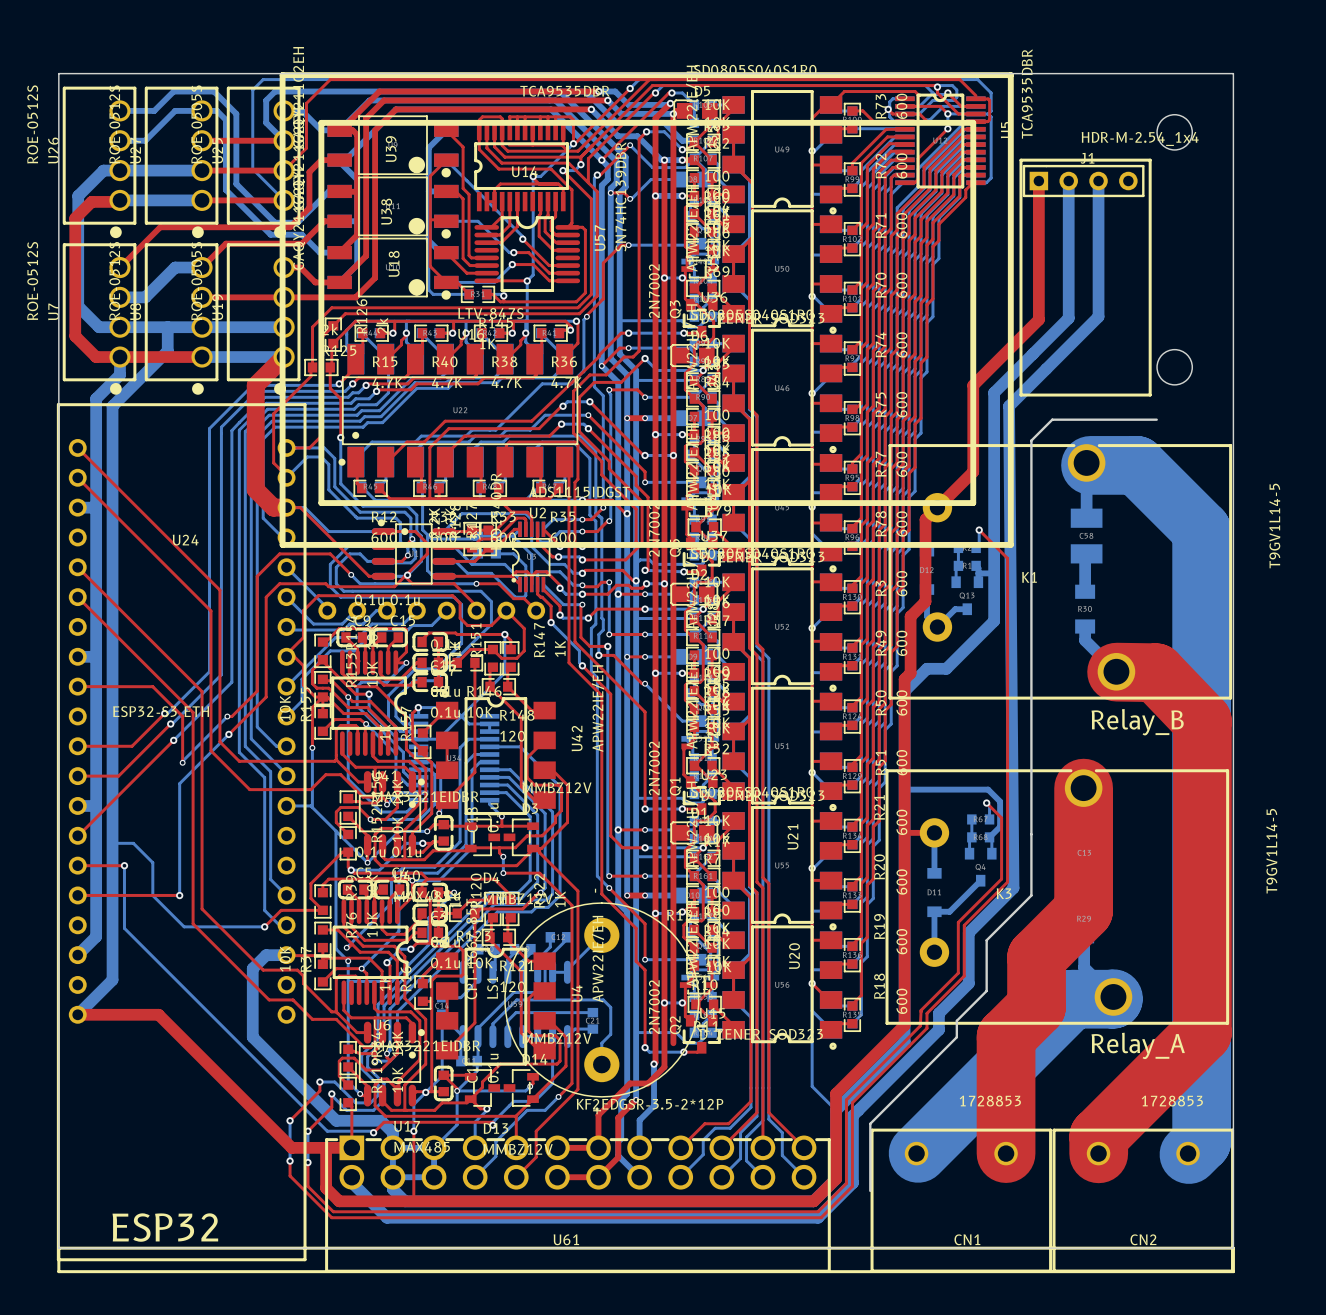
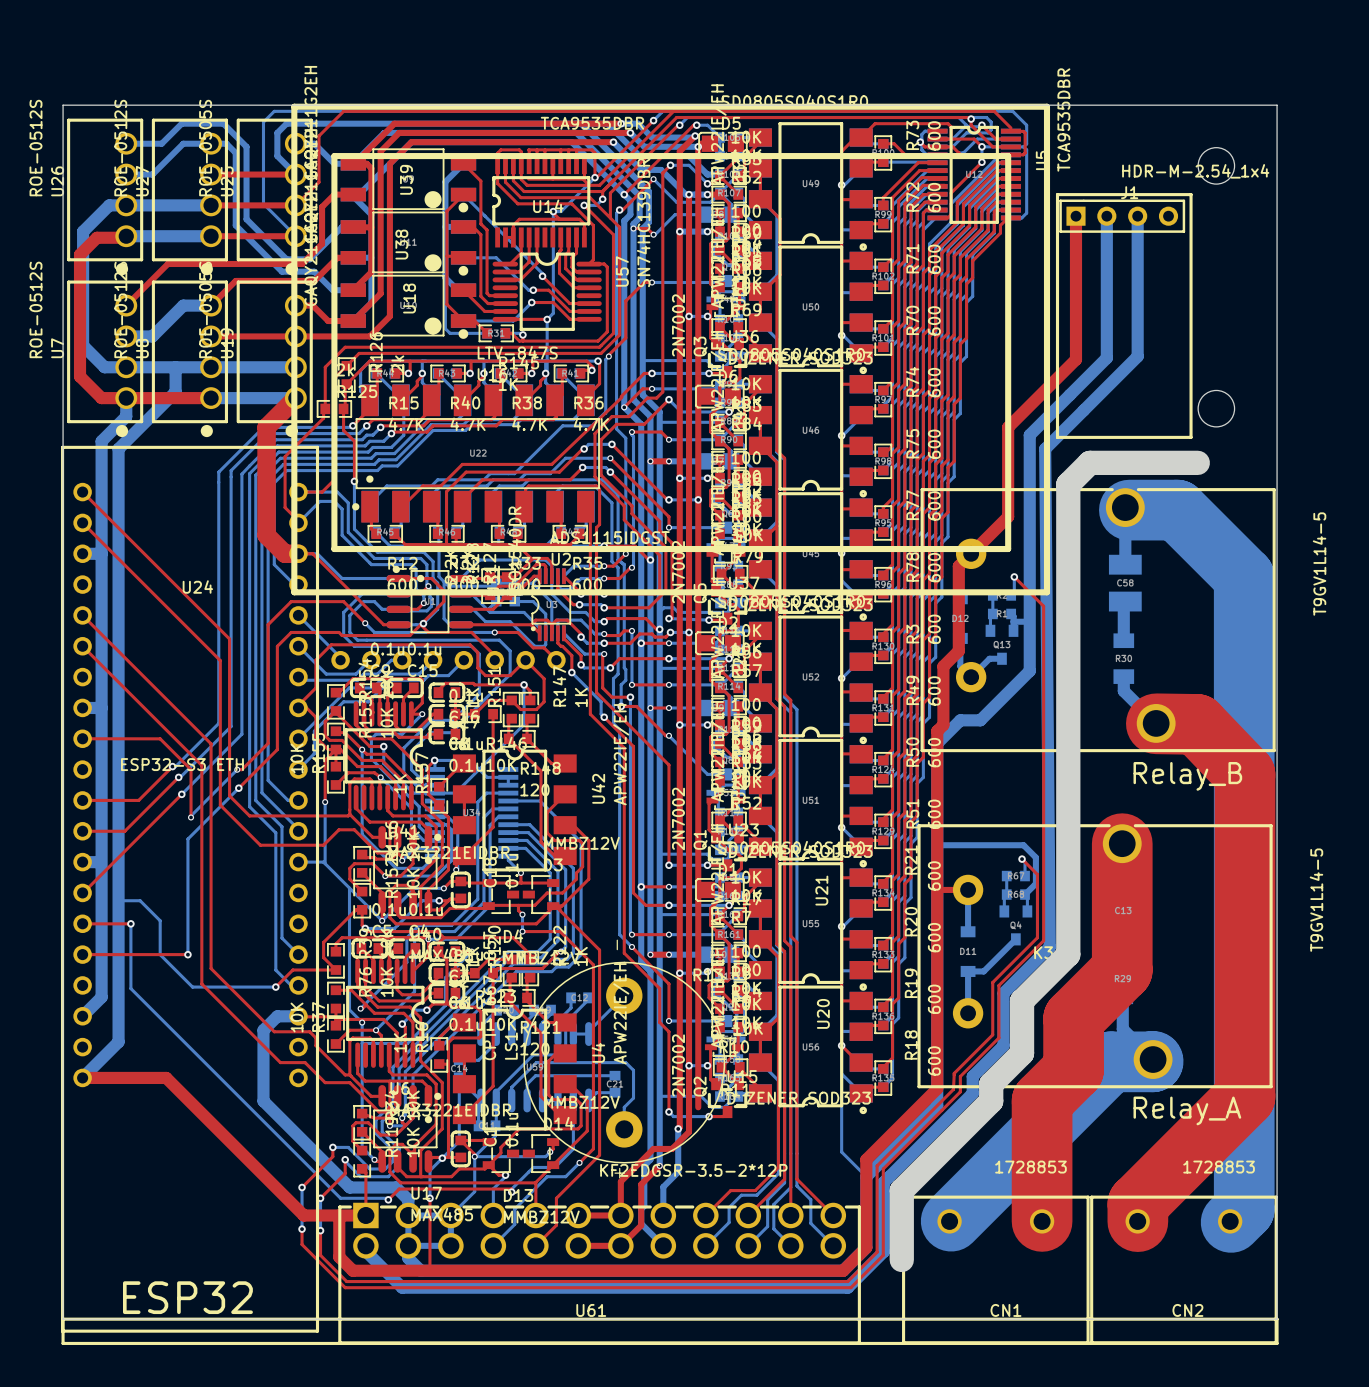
board edge width: thin (1156, 419) (1052, 419) (1031, 440) (1031, 895) (986, 940) (986, 991) (956, 1020) (956, 1037) (870, 1123) (870, 1190) -> thick (1197, 462) (1089, 462) (1068, 484) (1068, 954) (1022, 1000) (1022, 1053) (991, 1084) (991, 1101) (901, 1190) (901, 1259)

